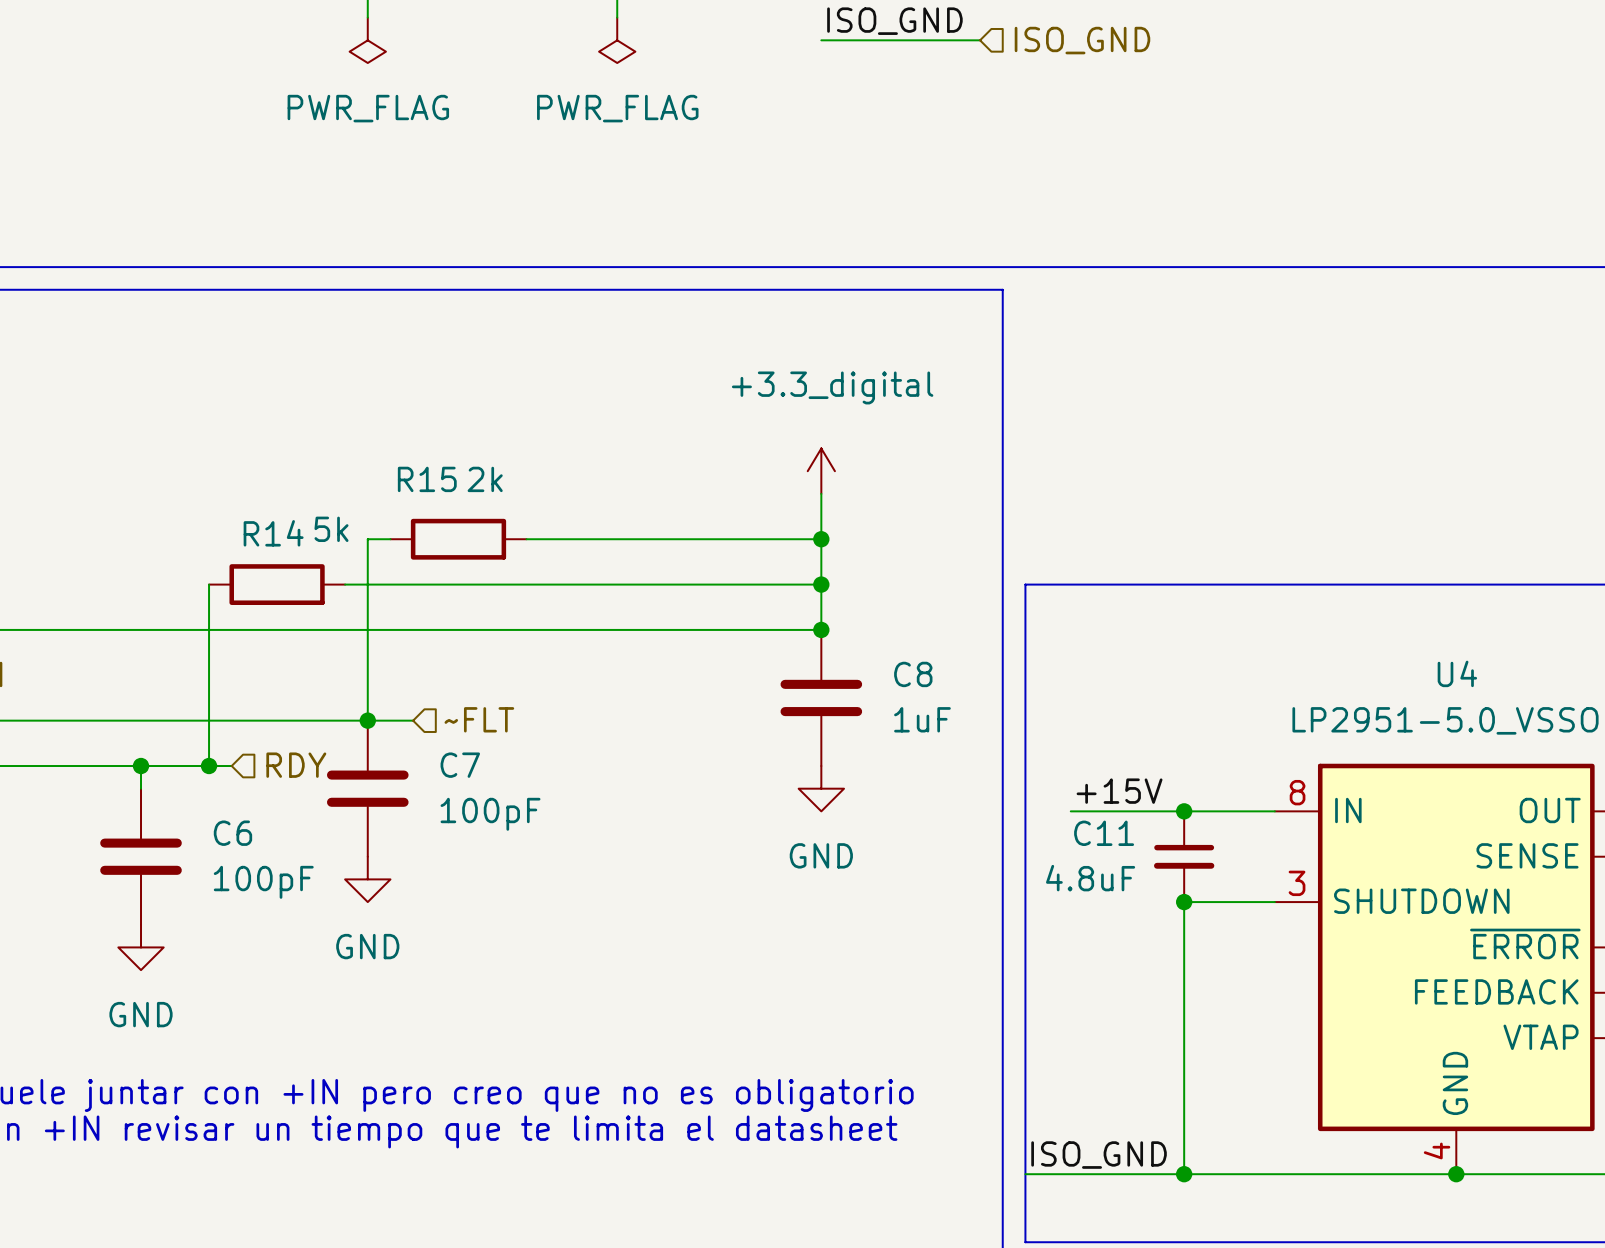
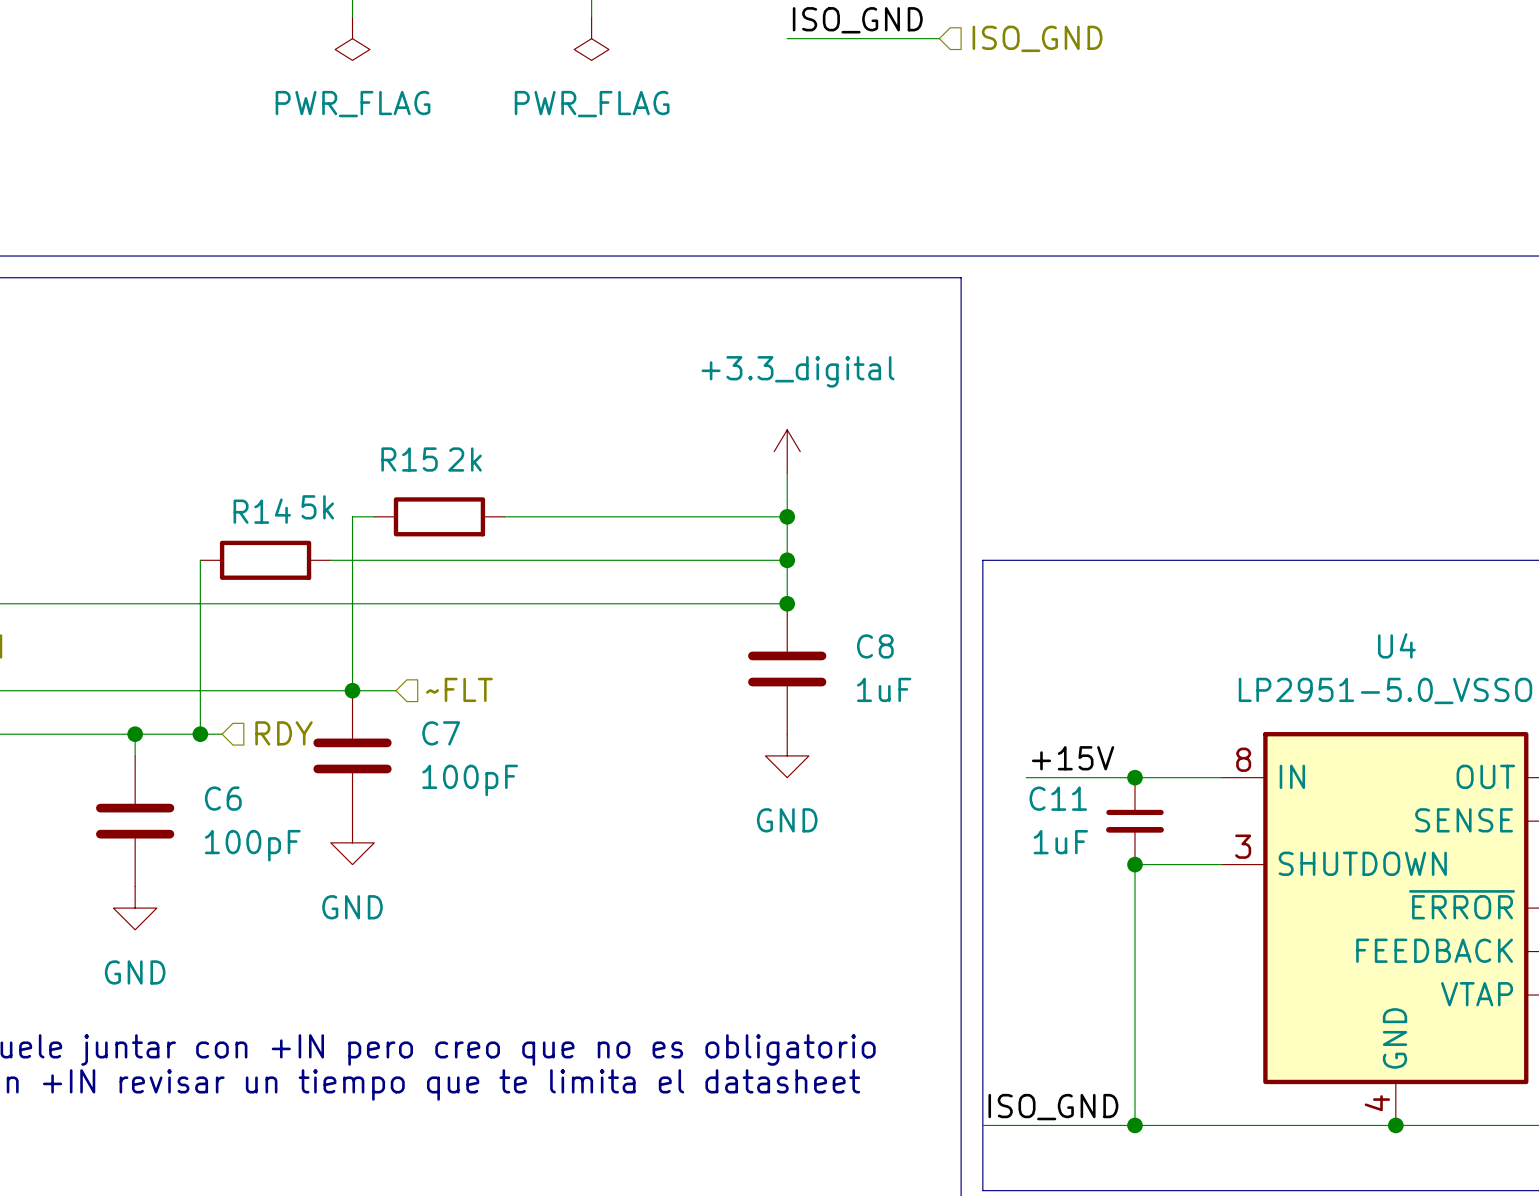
C11 value: 4.8uF (1090, 878) -> 1uF (1060, 842)

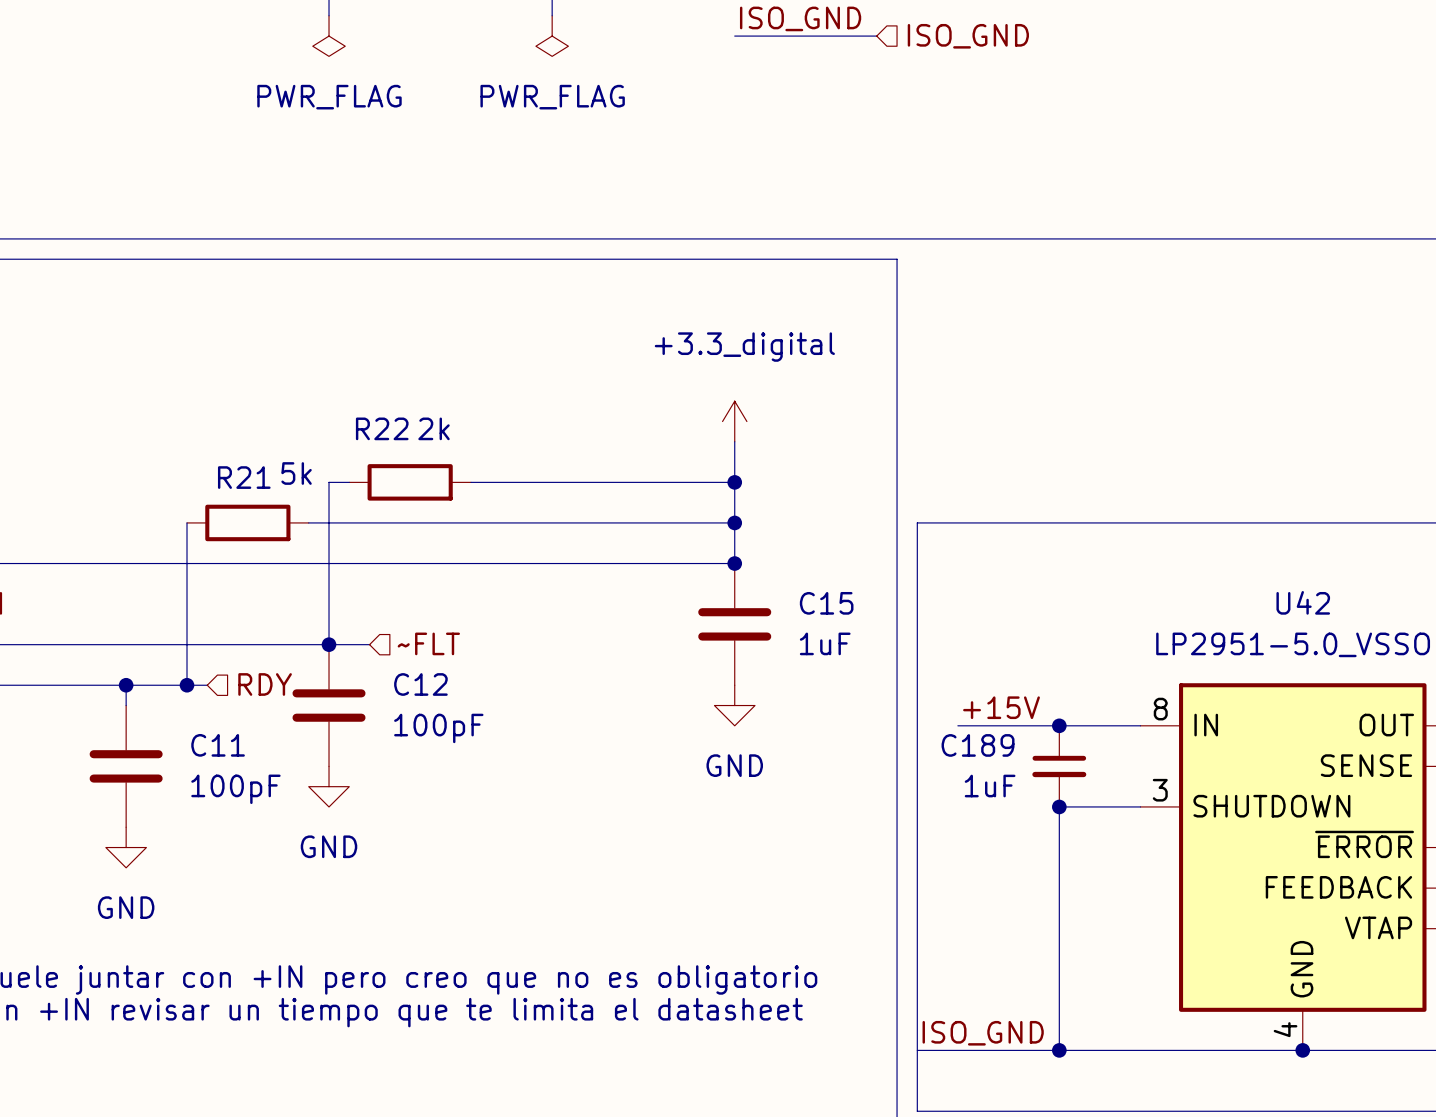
R15 name: R15 (409, 459) -> R22 (382, 428)
R14 name: R14 (262, 511) -> R21 (244, 477)
U4 name: U4 (1396, 645) -> U42 (1303, 602)
C8 name: C8 (875, 646) -> C15 (826, 603)
C7 name: C7 (441, 733) -> C12 (420, 684)
C6 name: C6 (223, 798) -> C11 (218, 745)
C11 name: C11 (1058, 798) -> C189 (978, 745)

